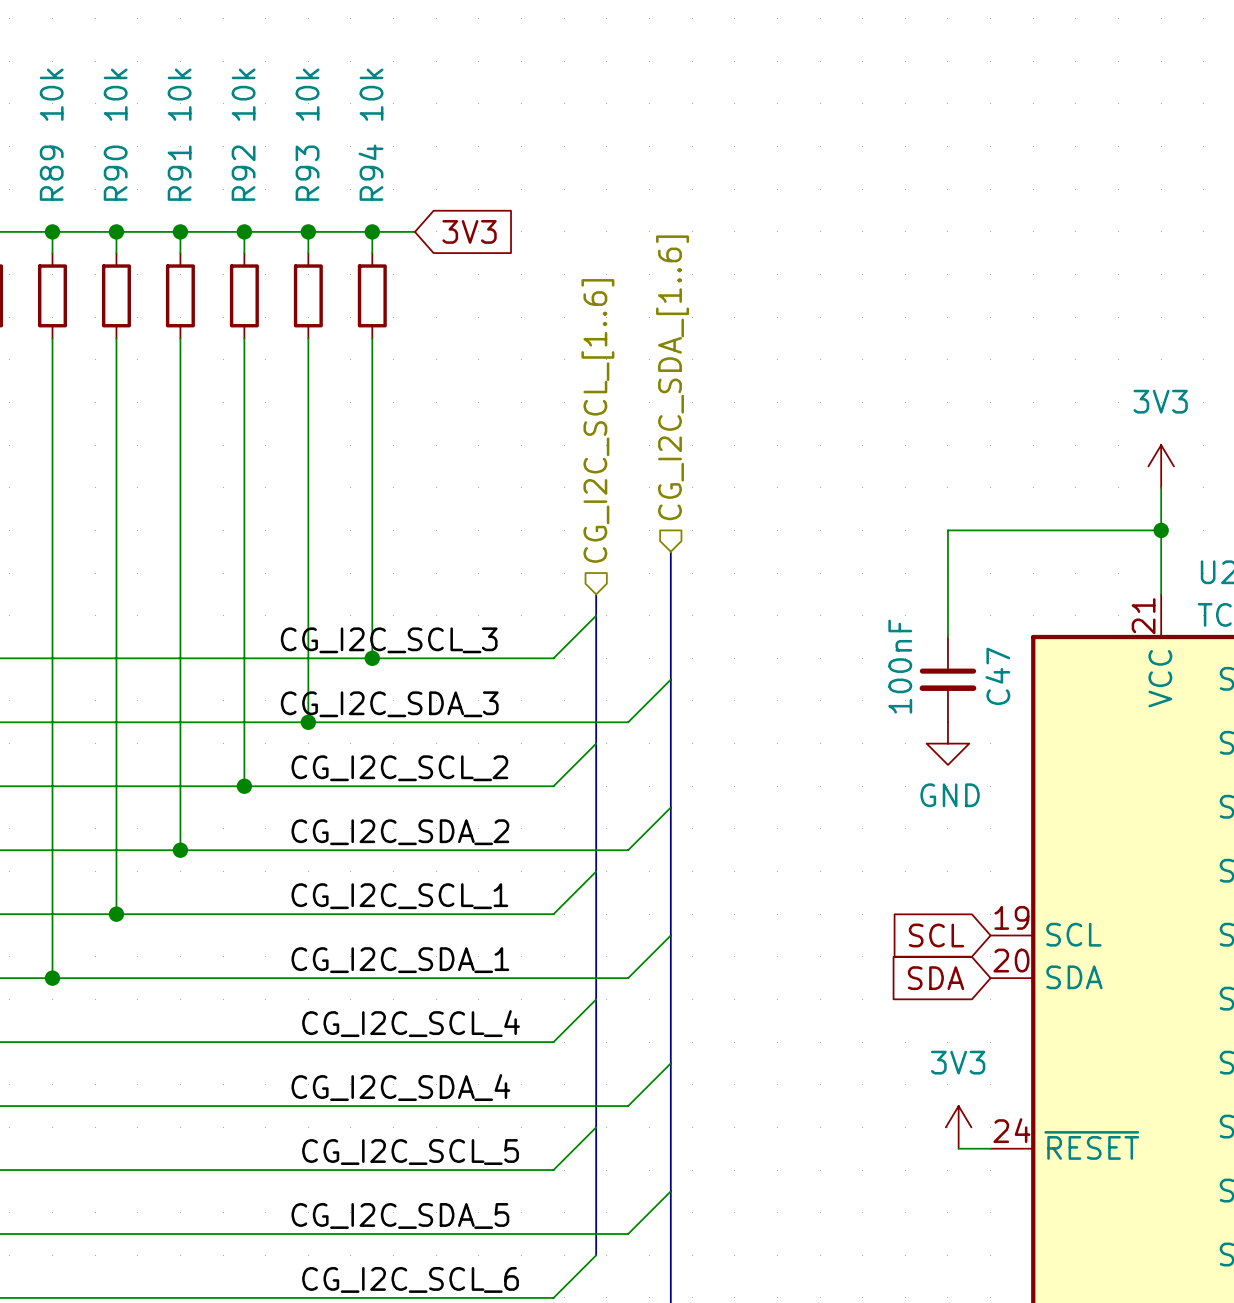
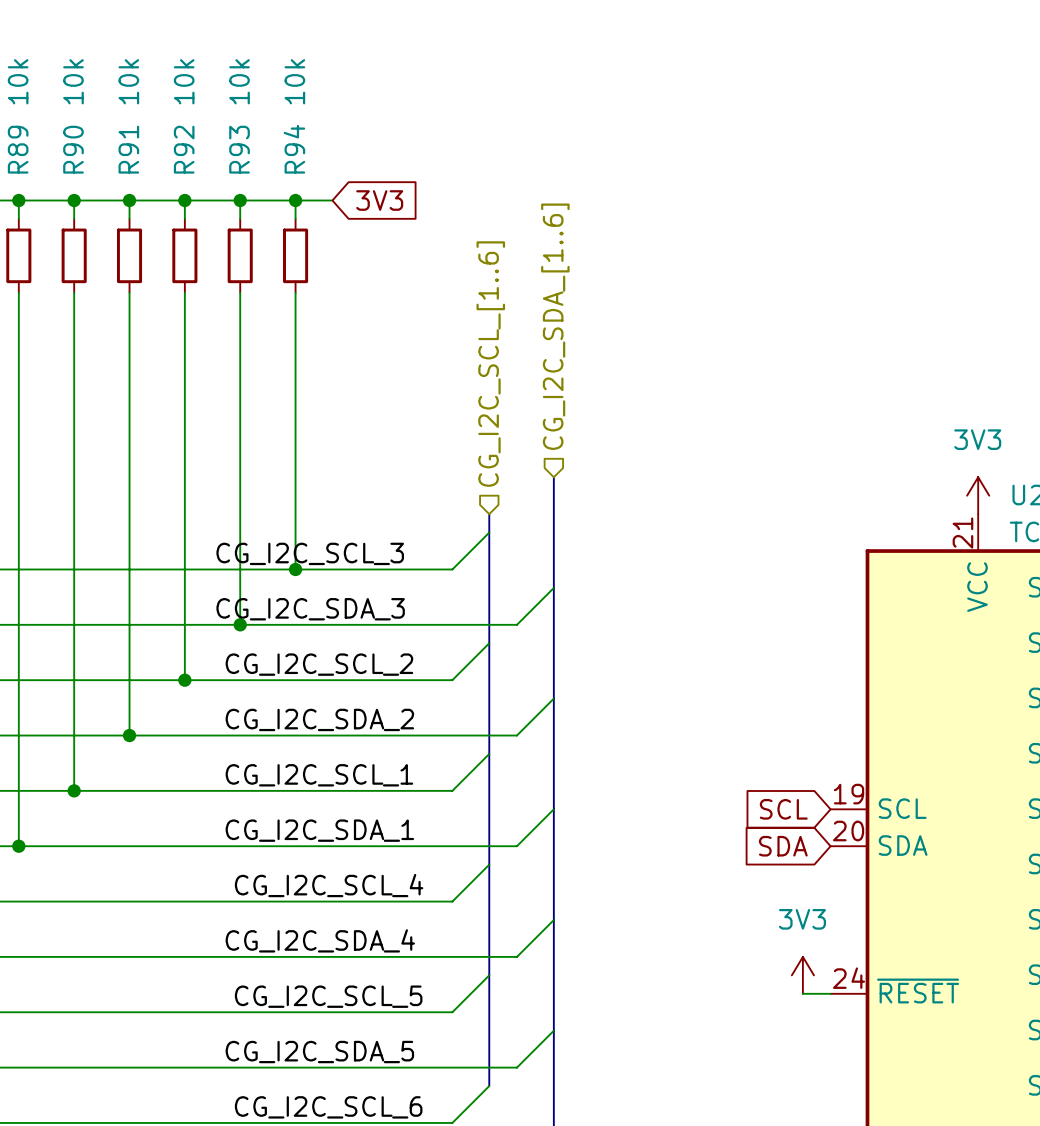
power symbol position: 3V3 (1161, 466) -> 3V3 (978, 495)
wire: (1161, 487) (1161, 594) -> none
wire: (1161, 530) (947, 530) (947, 637) -> none
junction: (1161, 530) -> none
C47: 100nF (947, 679) -> none
power symbol: GND (947, 743) -> none

